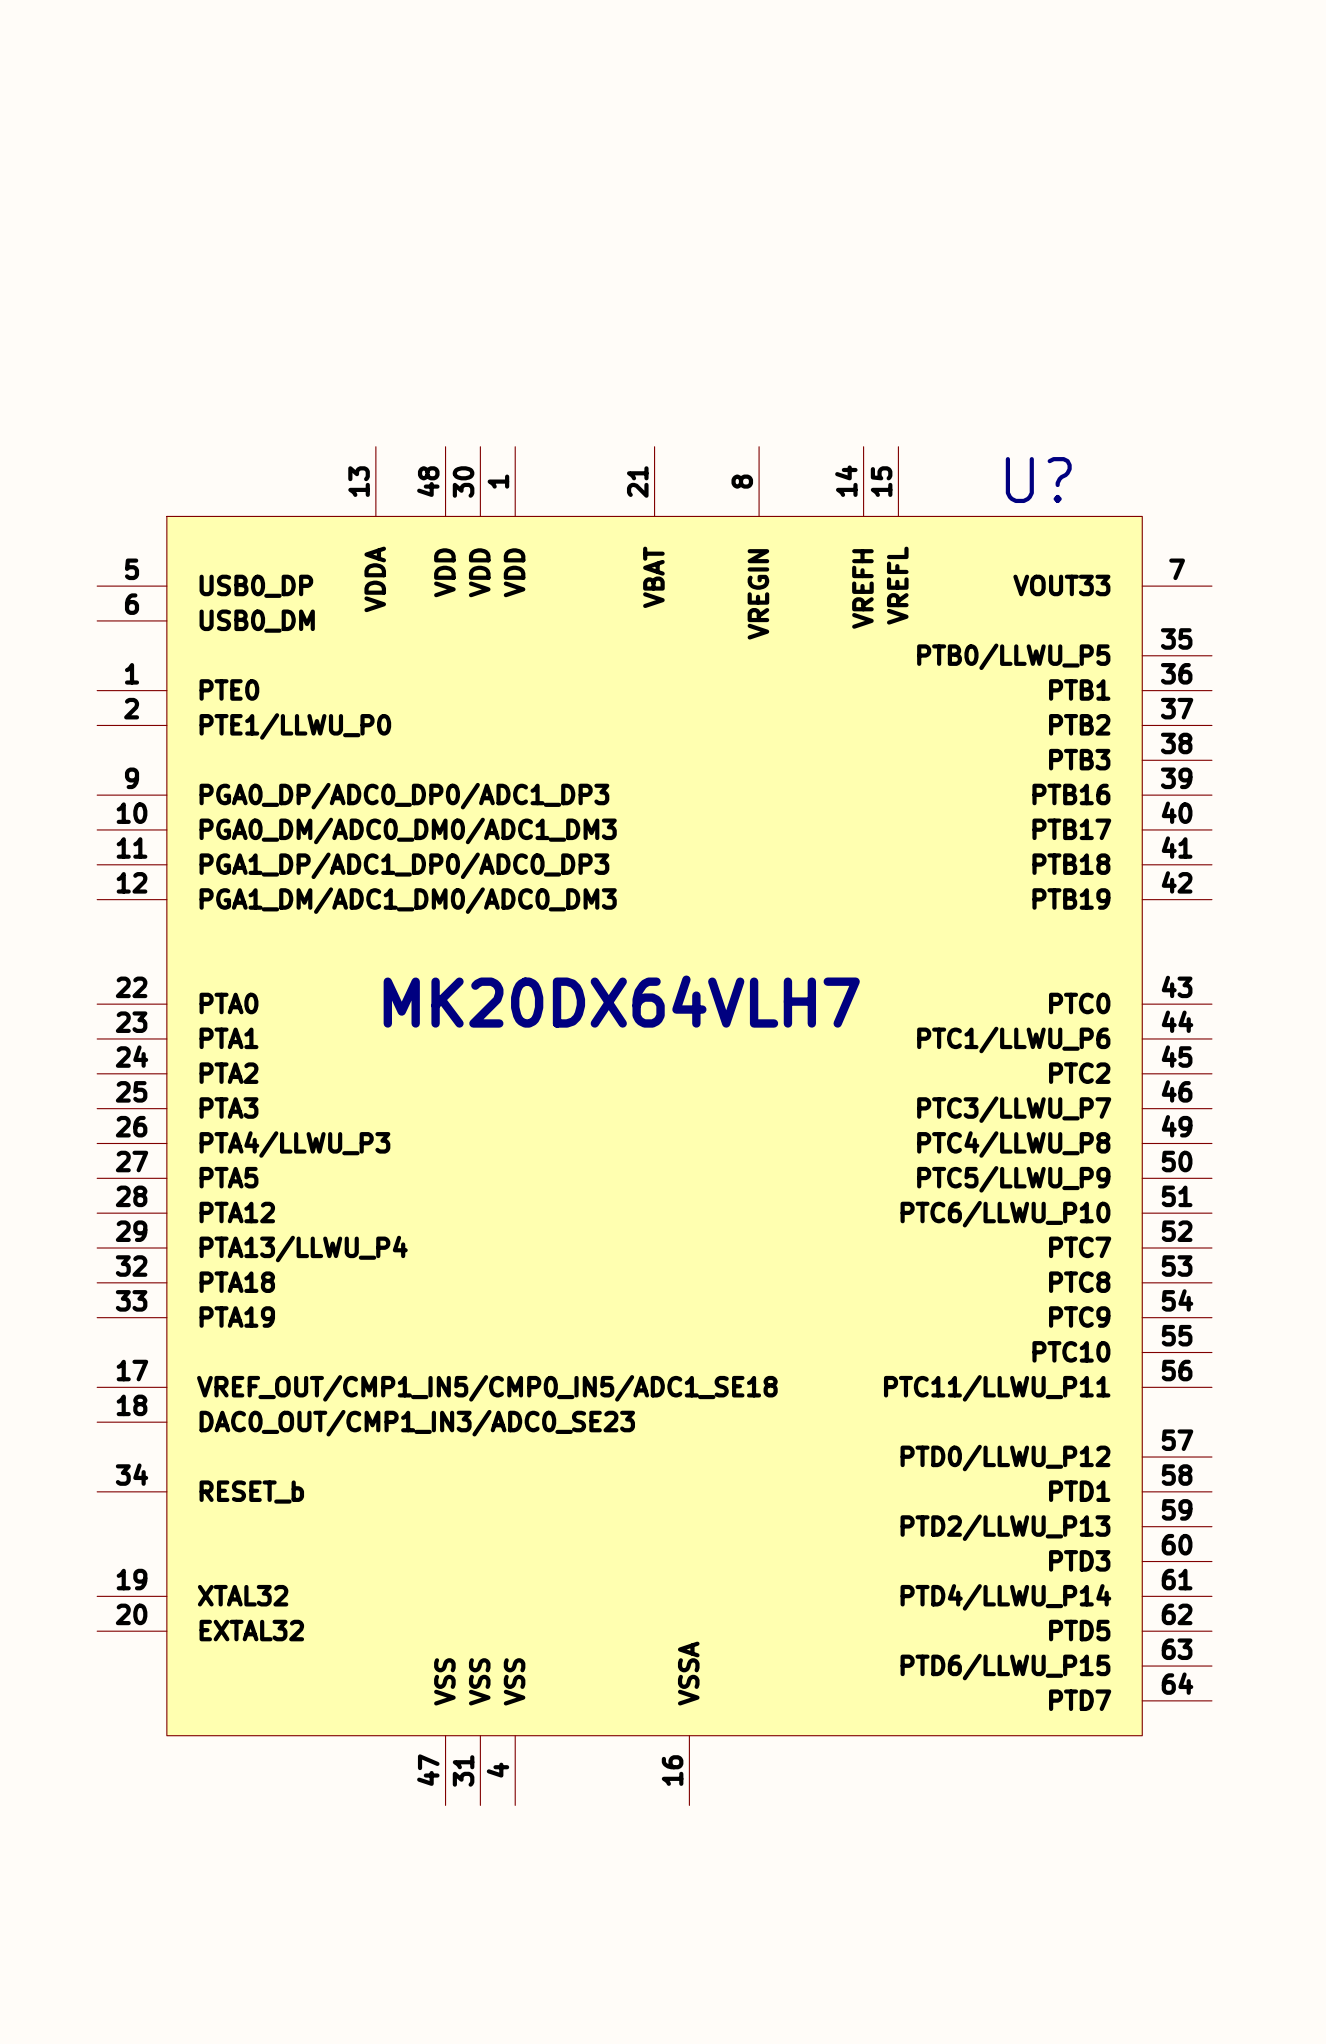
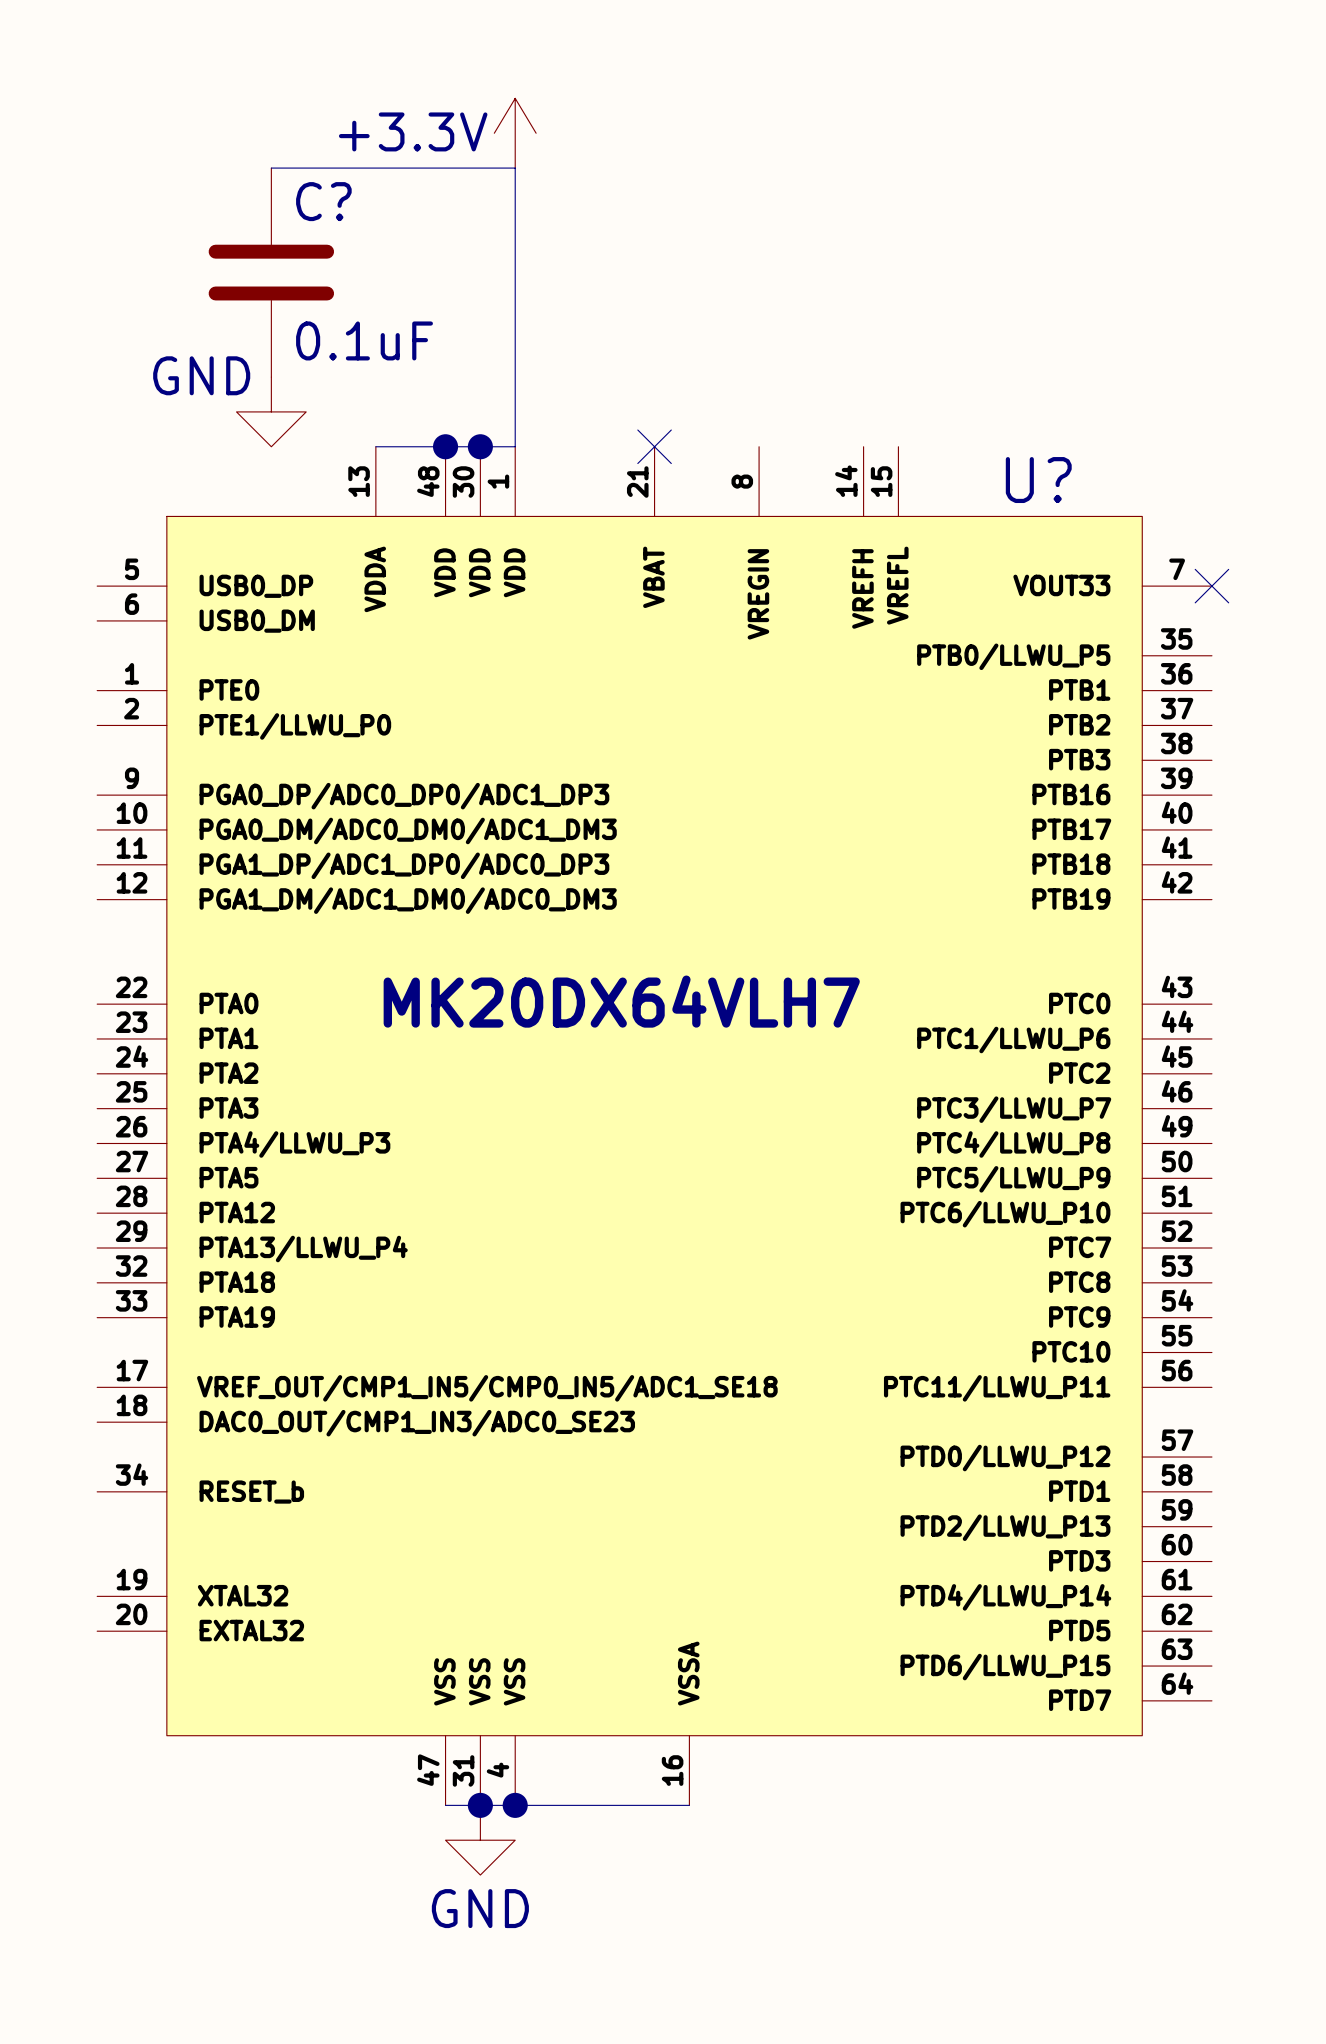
power symbol: none -> +3.3V (515, 133)
wire: none -> (271, 168) (515, 168) (515, 446) (375, 446)
C?: none -> 0.1uF (271, 272)
power symbol: none -> GND (271, 411)
junction: none -> (445, 446)
junction: none -> (480, 446)
no-connect mark: none -> (654, 446)
no-connect mark: none -> (1211, 586)
wire: none -> (445, 1805) (689, 1805)
junction: none -> (480, 1805)
junction: none -> (515, 1805)
power symbol: none -> GND (480, 1840)

